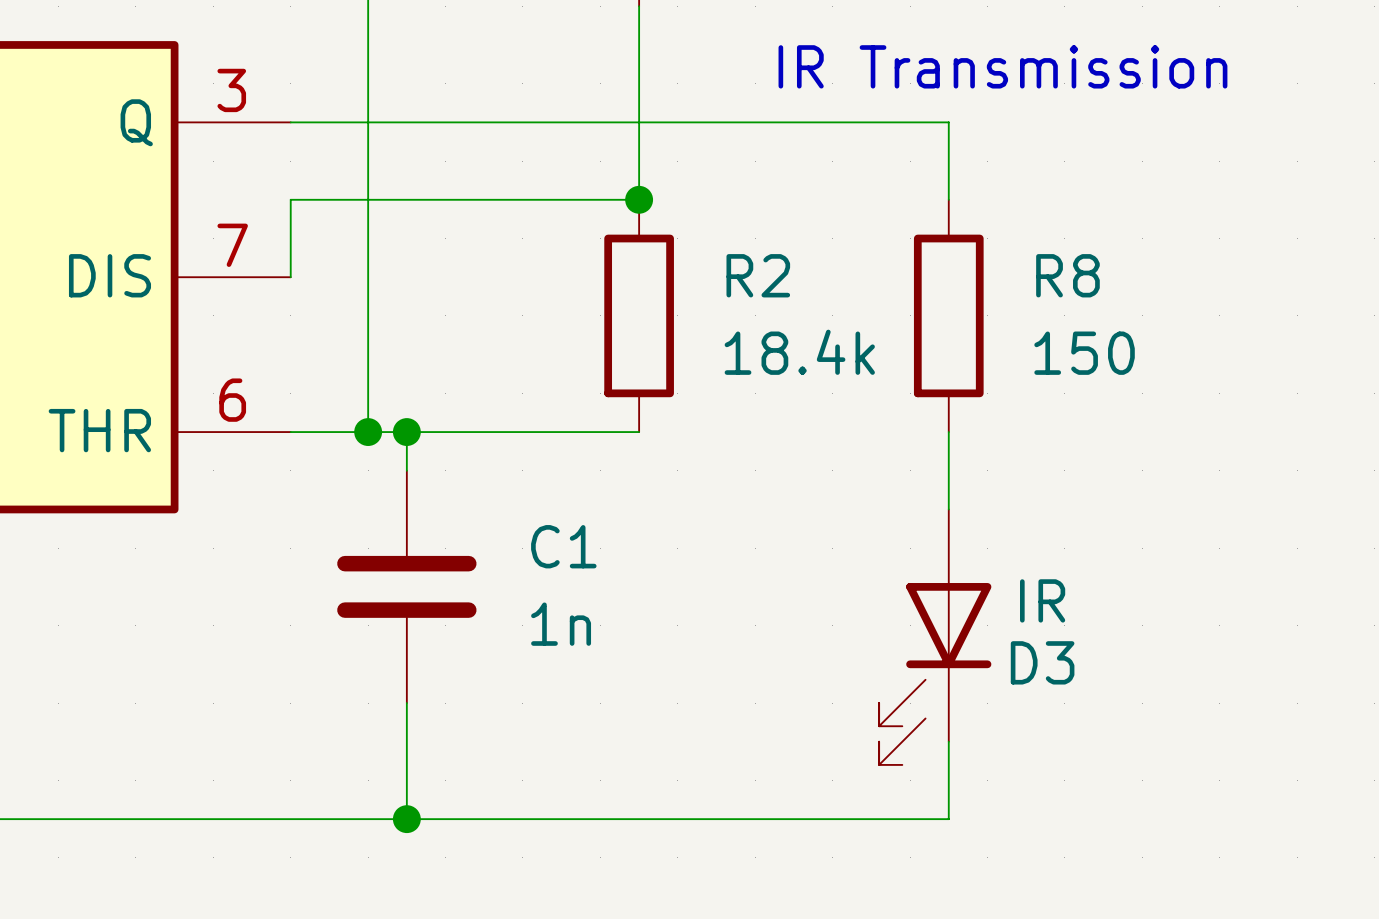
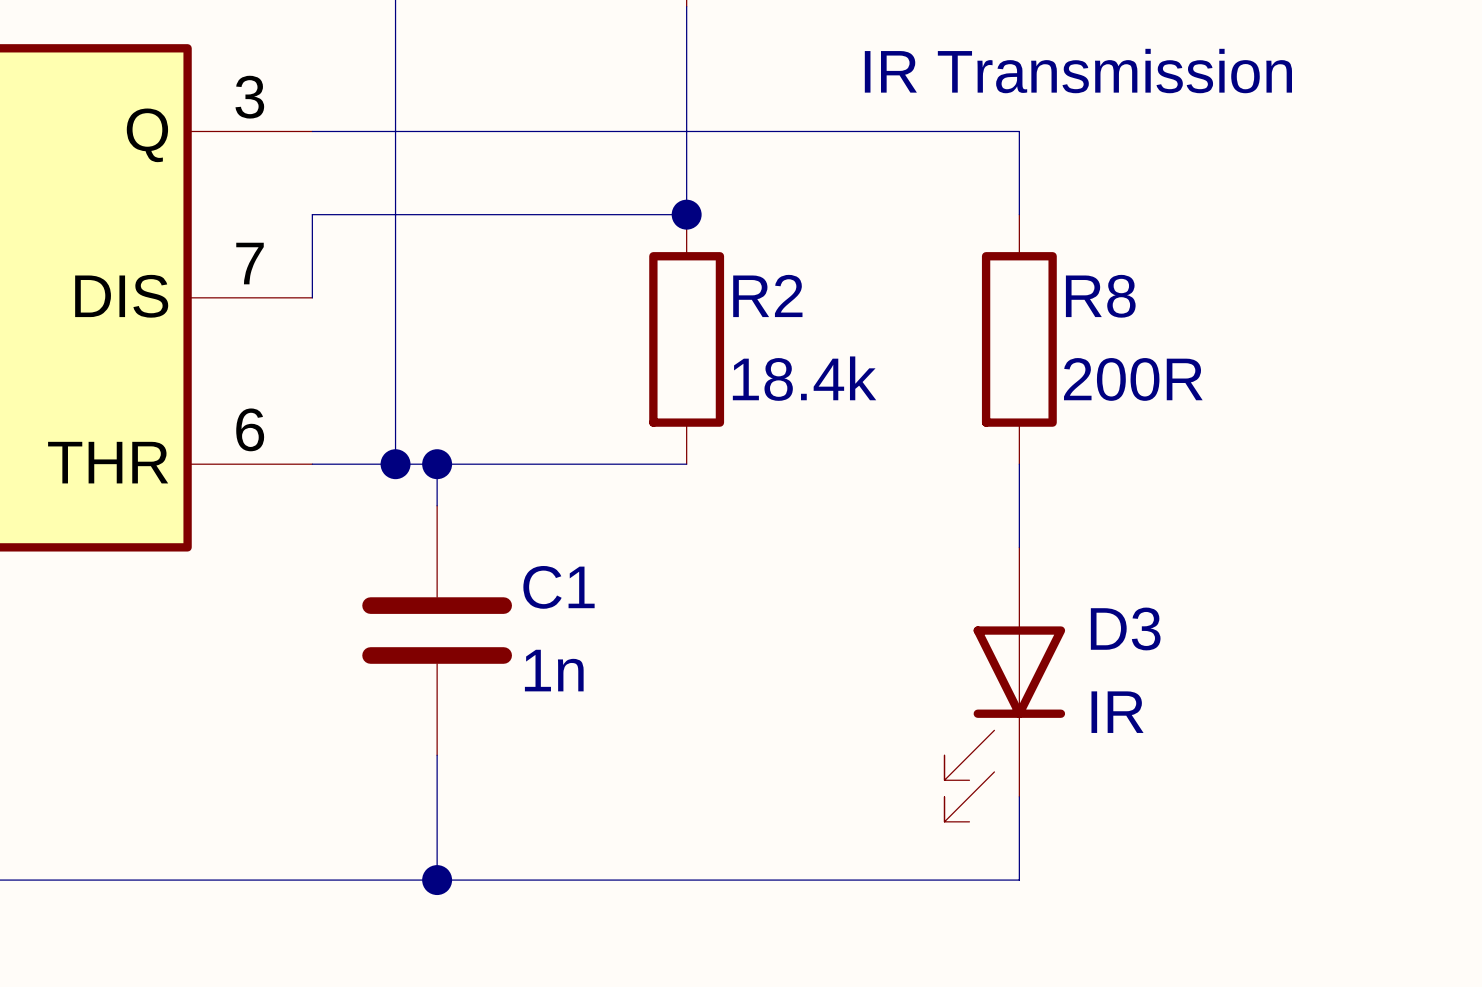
R2 name position: R2 (758, 275) -> R2 (767, 295)
R8 name position: R8 (1067, 275) -> R8 (1100, 296)
R2 value position: 18.4k (799, 352) -> 18.4k (804, 378)
R8 value: 150 (1084, 353) -> 200R (1133, 379)
C1 name position: C1 (563, 546) -> C1 (559, 587)
D3 value position: IR (1042, 600) -> IR (1117, 712)
C1 value position: 1n (561, 624) -> 1n (554, 670)
D3 name position: D3 (1042, 662) -> D3 (1125, 628)

